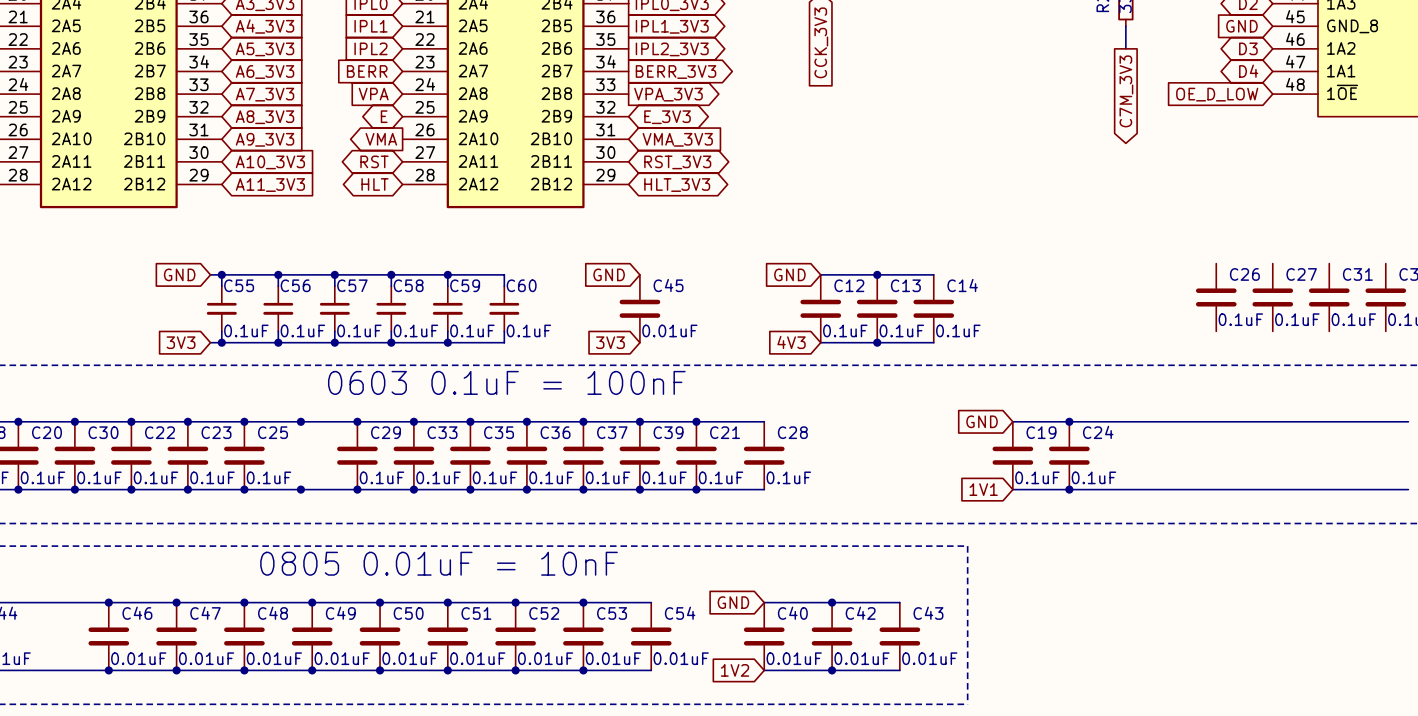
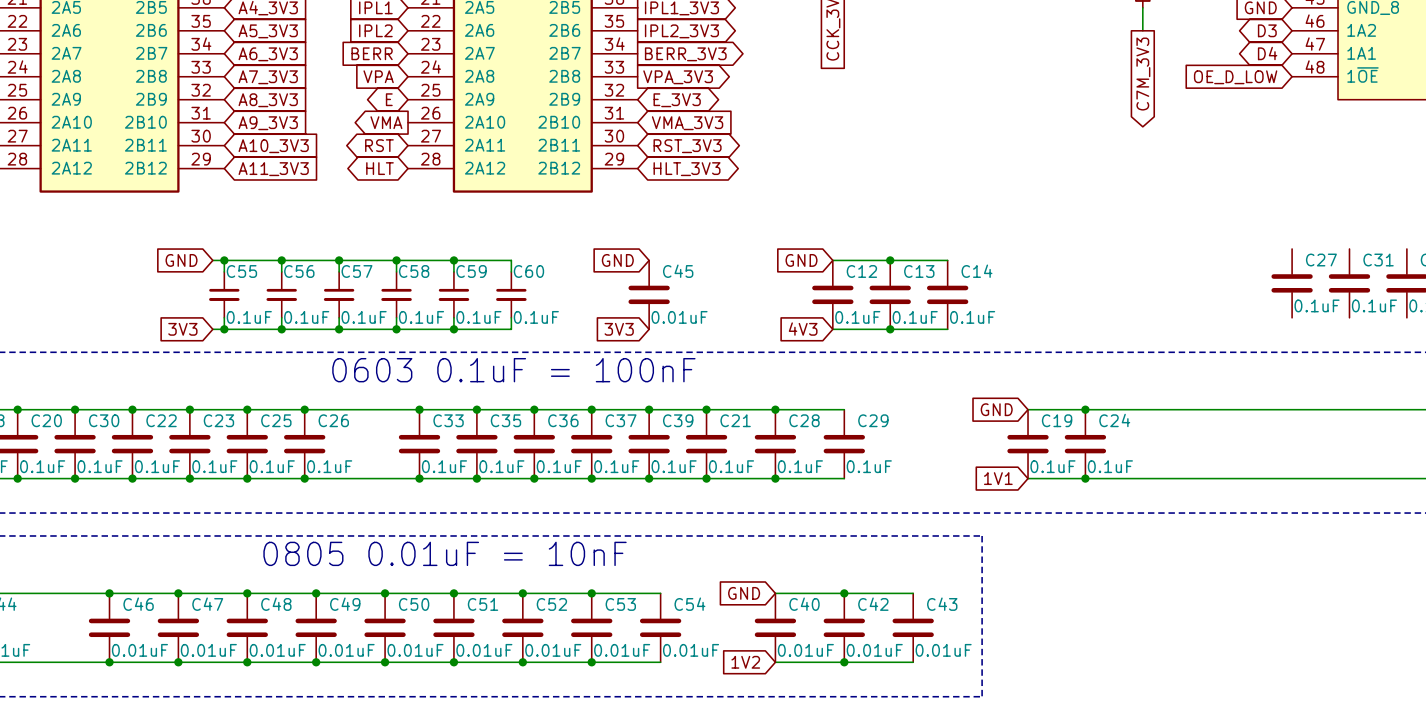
C26 position: (1216, 297) -> (304, 444)
junction: (357, 421) -> none
wire: none -> (775, 409) (844, 409)
junction: none -> (775, 409)
C29 position: (357, 455) -> (844, 444)
junction: (357, 489) -> none
wire: none -> (775, 478) (844, 478)
junction: none -> (775, 478)

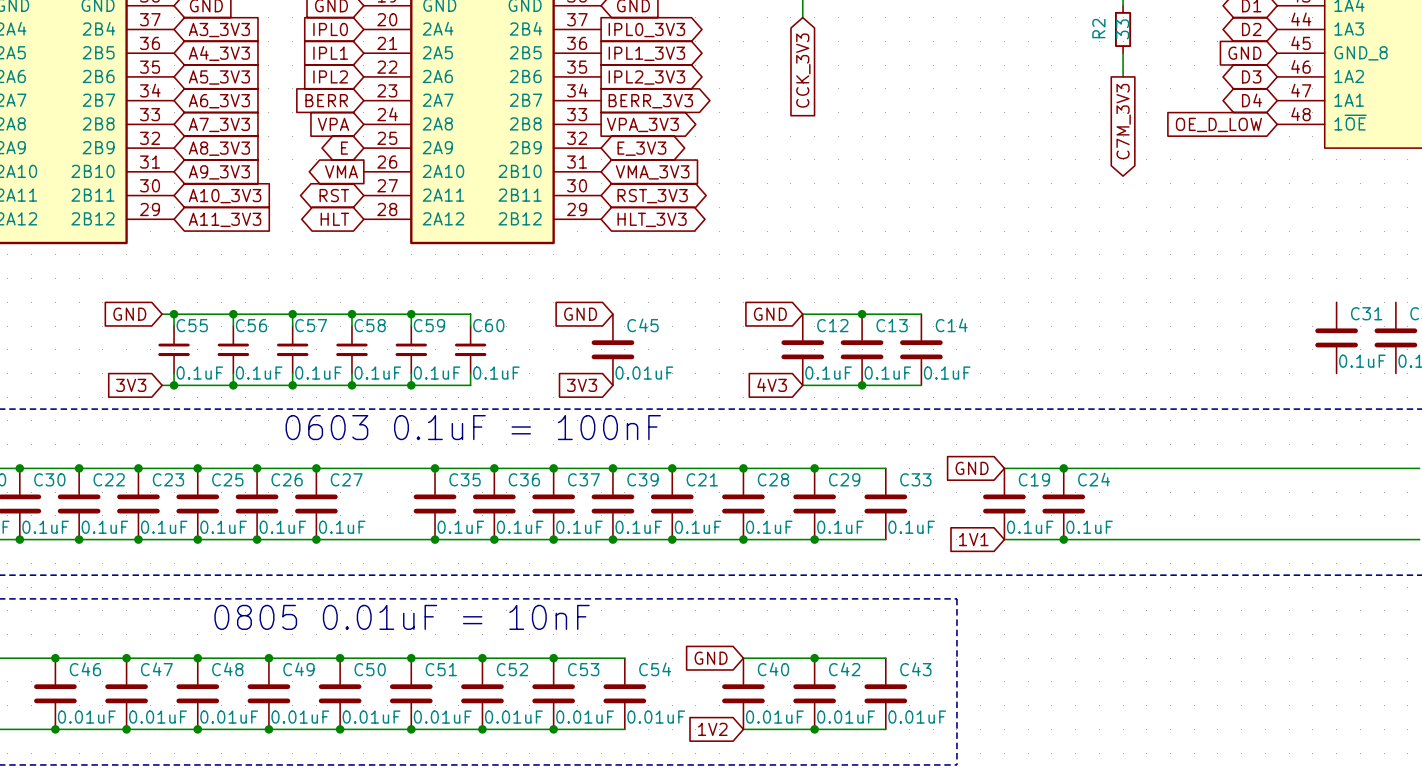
C27 position: (1292, 283) -> (316, 503)
junction: none -> (316, 468)
junction: (419, 409) -> none
wire: none -> (814, 468) (885, 468)
junction: none -> (814, 468)
C33 position: (419, 444) -> (885, 503)
junction: none -> (316, 539)
junction: (419, 478) -> none
wire: none -> (814, 539) (885, 539)
junction: none -> (814, 539)

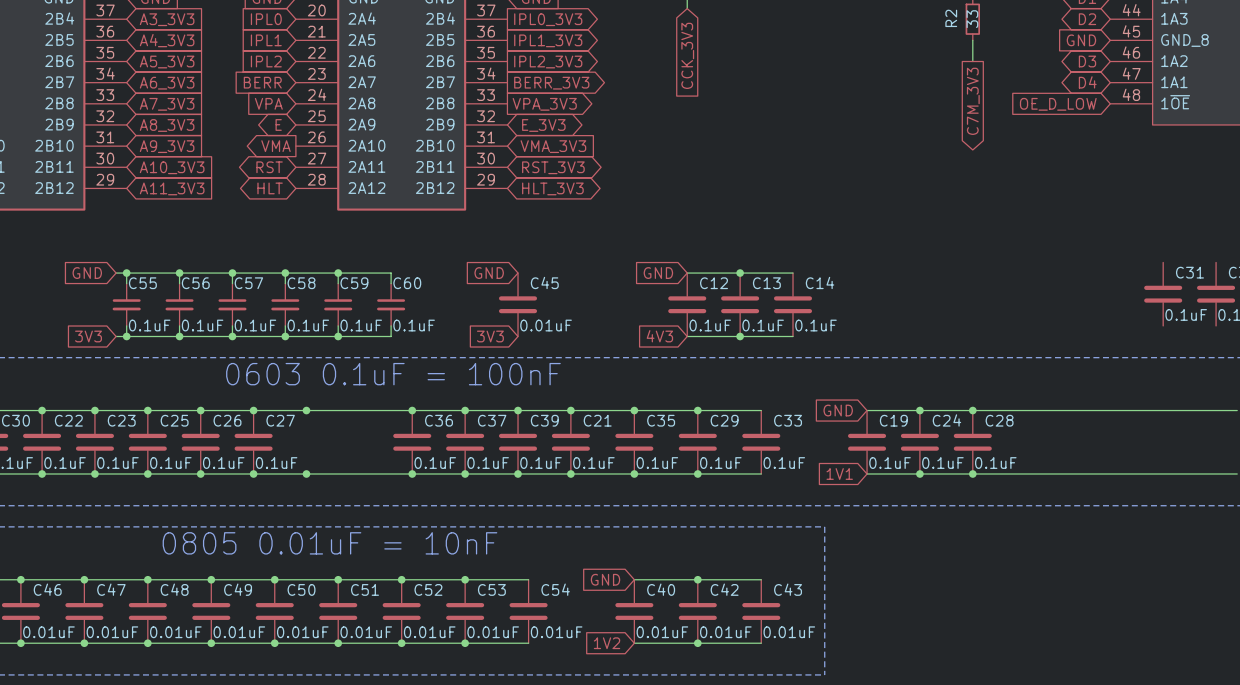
junction: none -> (306, 410)
junction: (435, 468) -> none
junction: none -> (972, 410)
C28 name: C28 (773, 479) -> C35 (661, 420)
C35: 0.1uF (435, 503) -> none
C28: none -> 0.1uF (972, 442)
junction: none -> (306, 473)
junction: (435, 539) -> none
junction: none -> (972, 473)

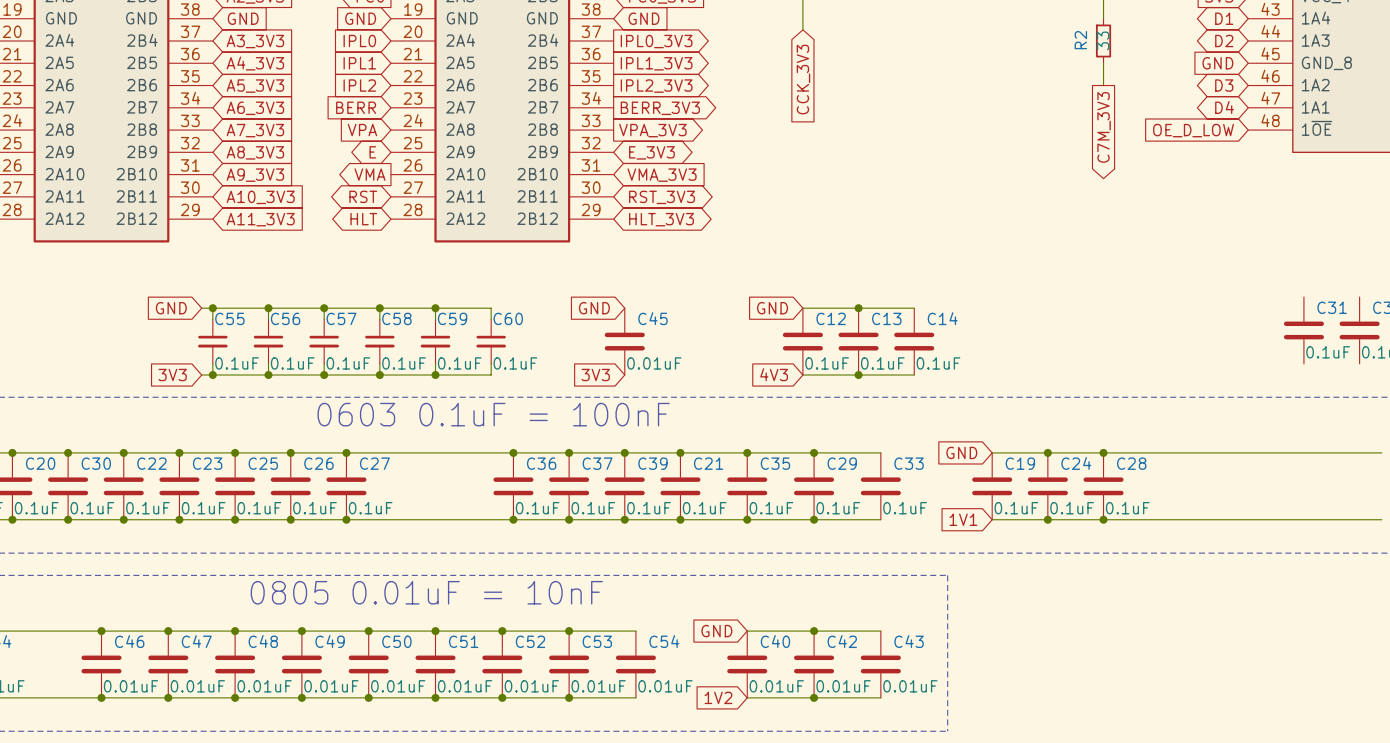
junction: (306, 410) -> none
junction: (306, 473) -> none

